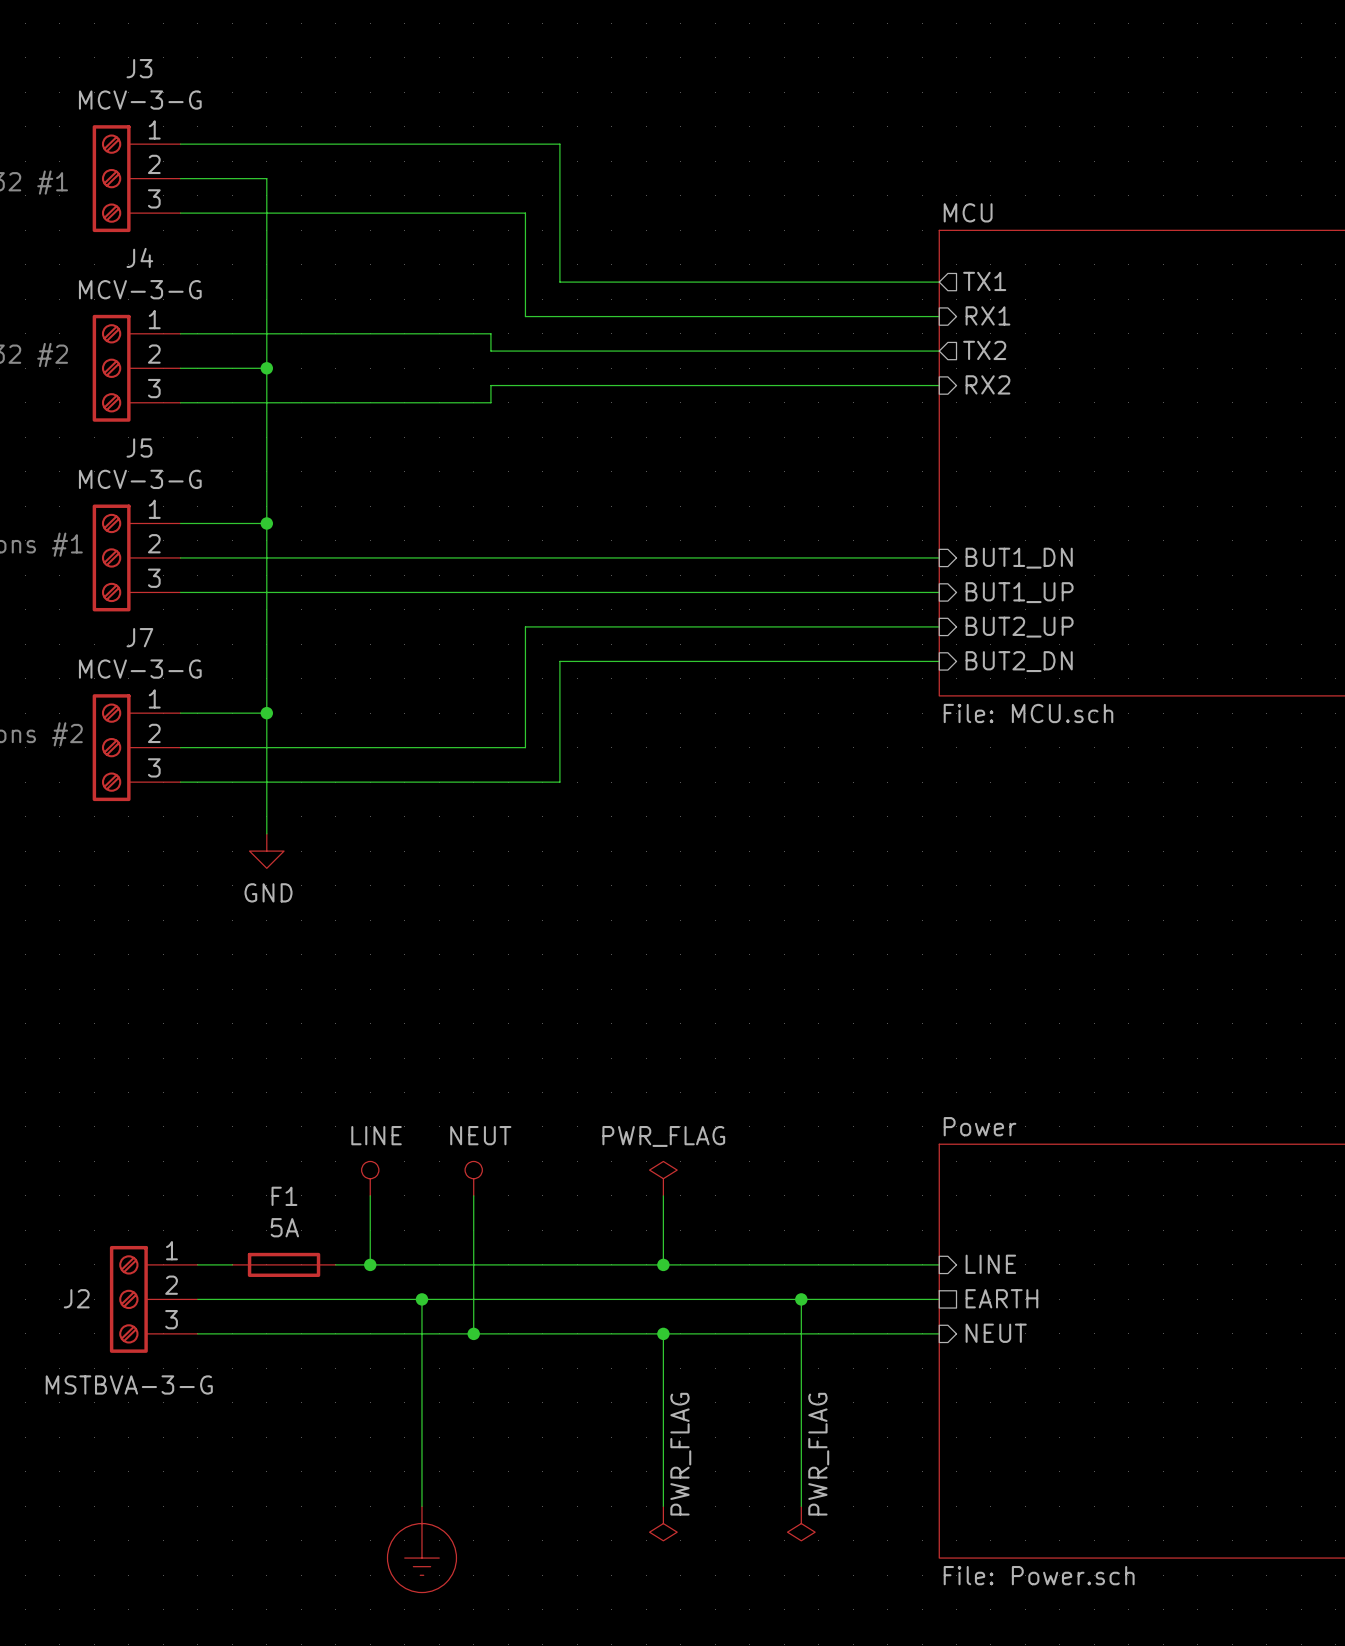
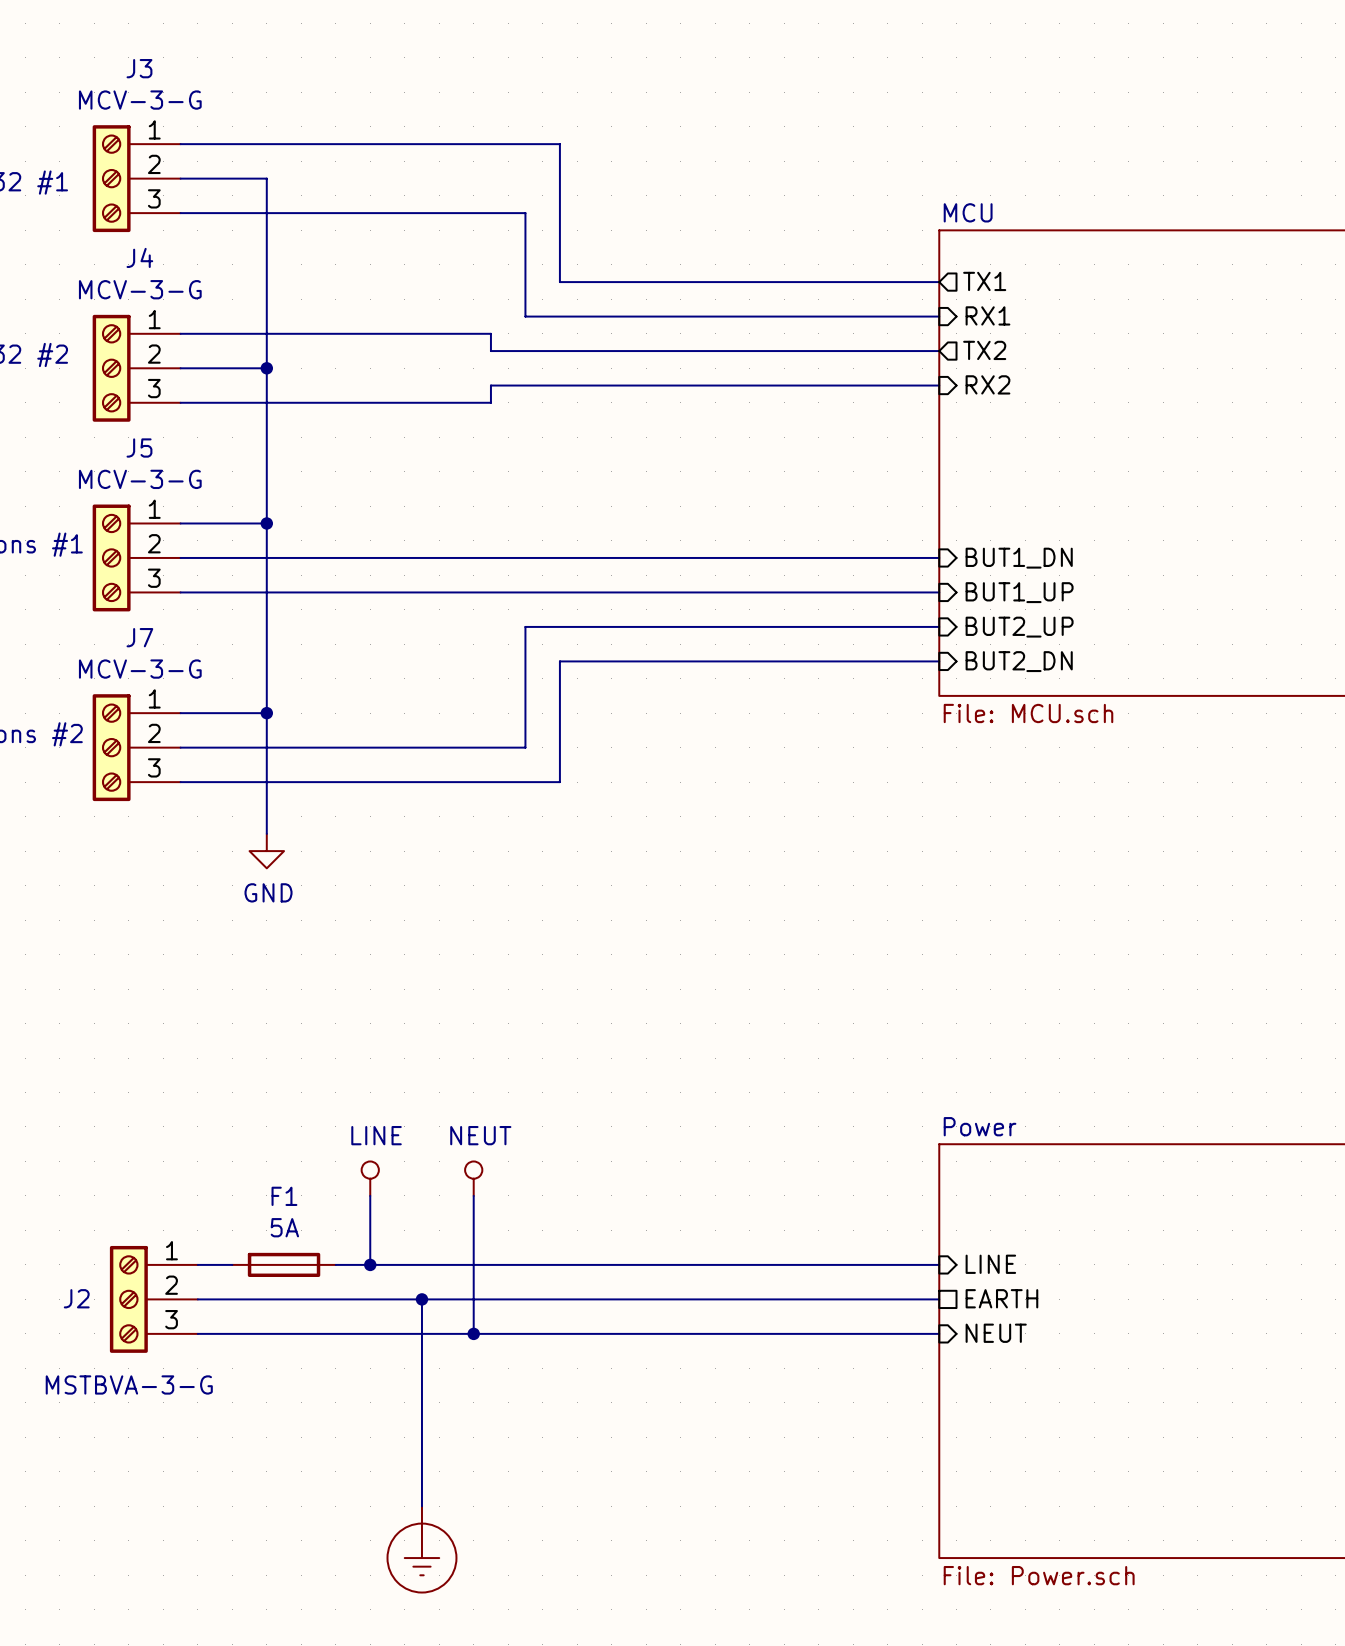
power symbol: PWR_FLAG (663, 1178) -> none
wire: (663, 1195) (663, 1264) -> none
junction: (663, 1264) -> none
wire: (801, 1299) (801, 1506) -> none
junction: (801, 1299) -> none
wire: (663, 1333) (663, 1506) -> none
junction: (663, 1333) -> none
power symbol: PWR_FLAG (663, 1523) -> none
power symbol: PWR_FLAG (801, 1523) -> none

